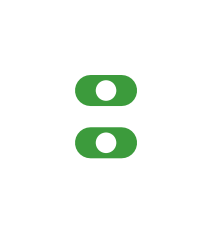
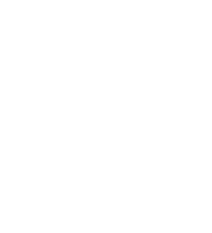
part: (106, 116) -> none

